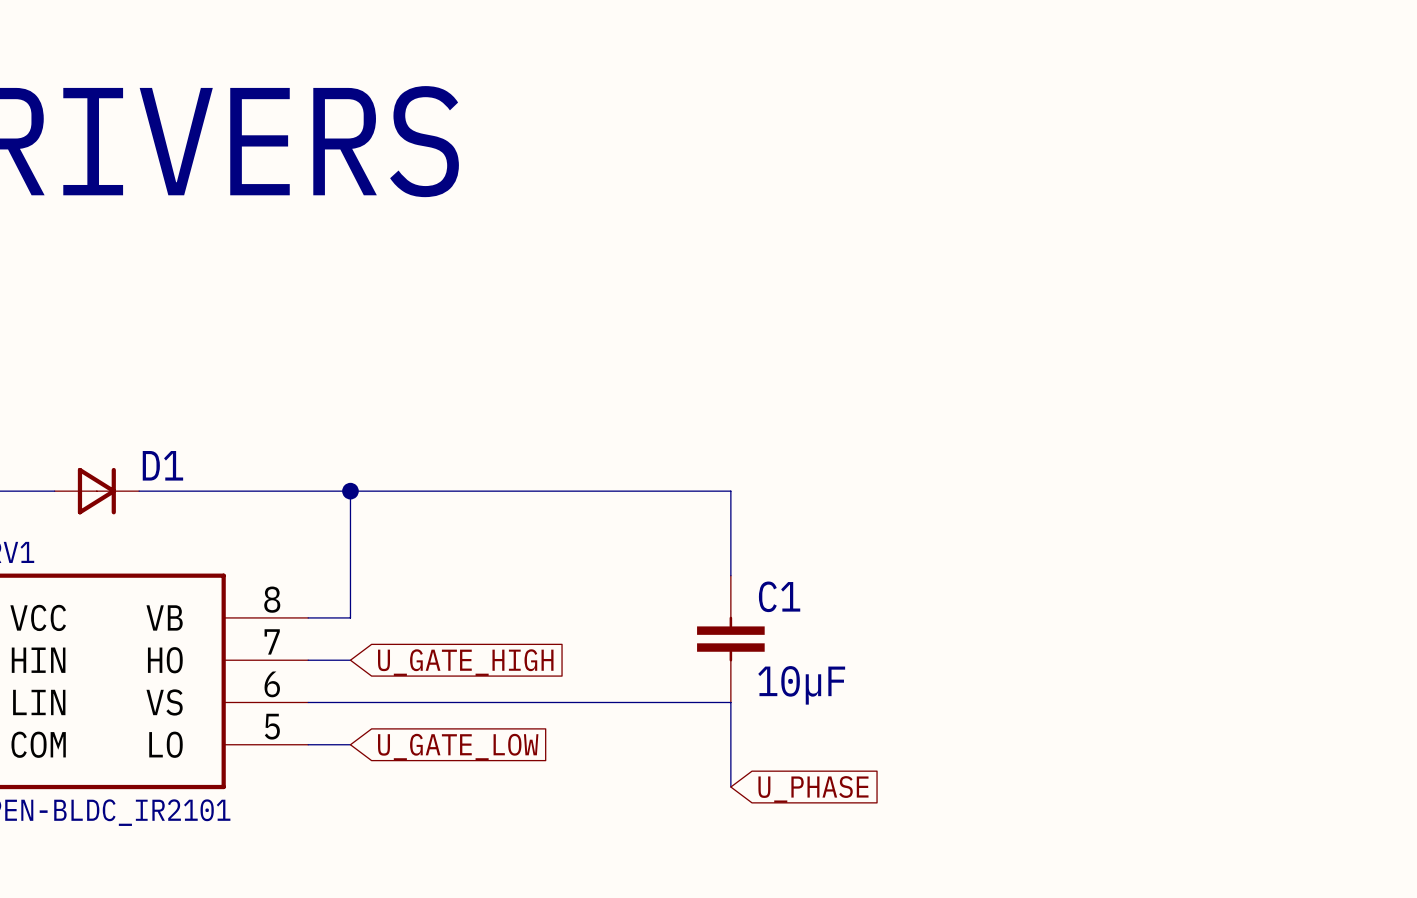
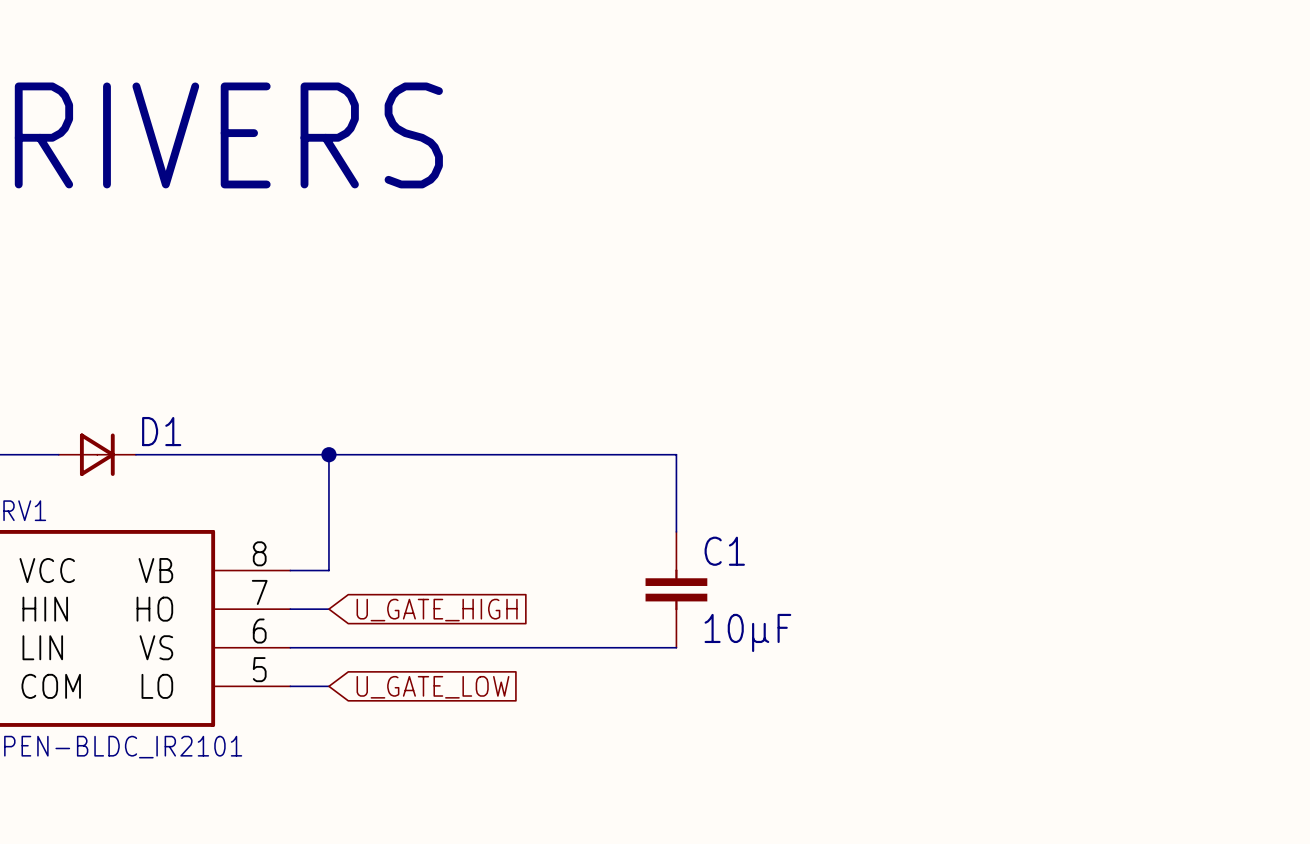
wire: (730, 702) (730, 787) -> none
global label: U_PHASE (813, 789) -> none

